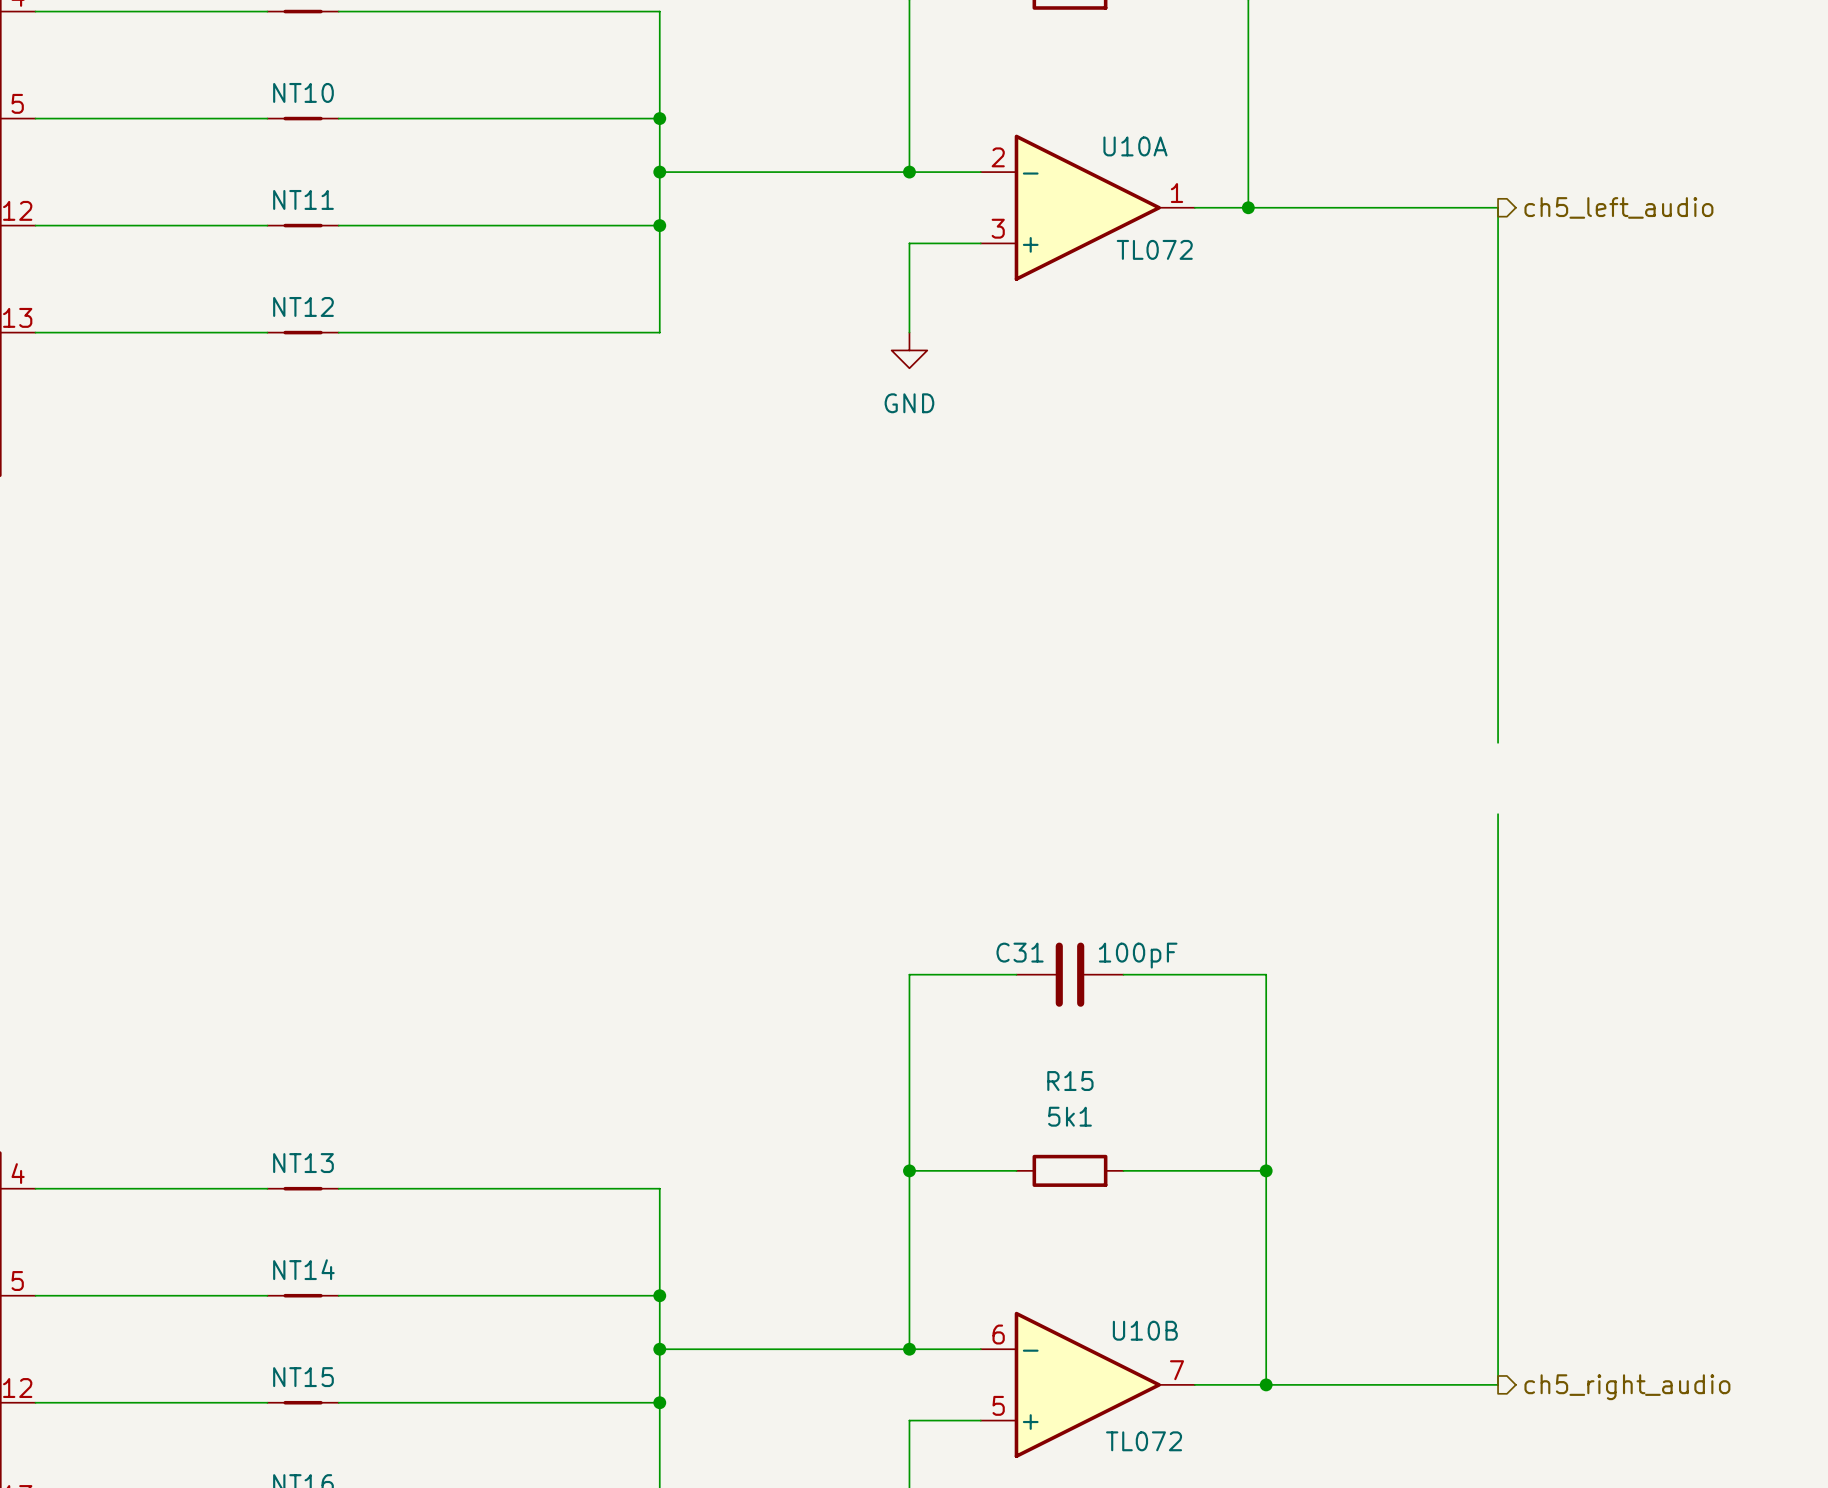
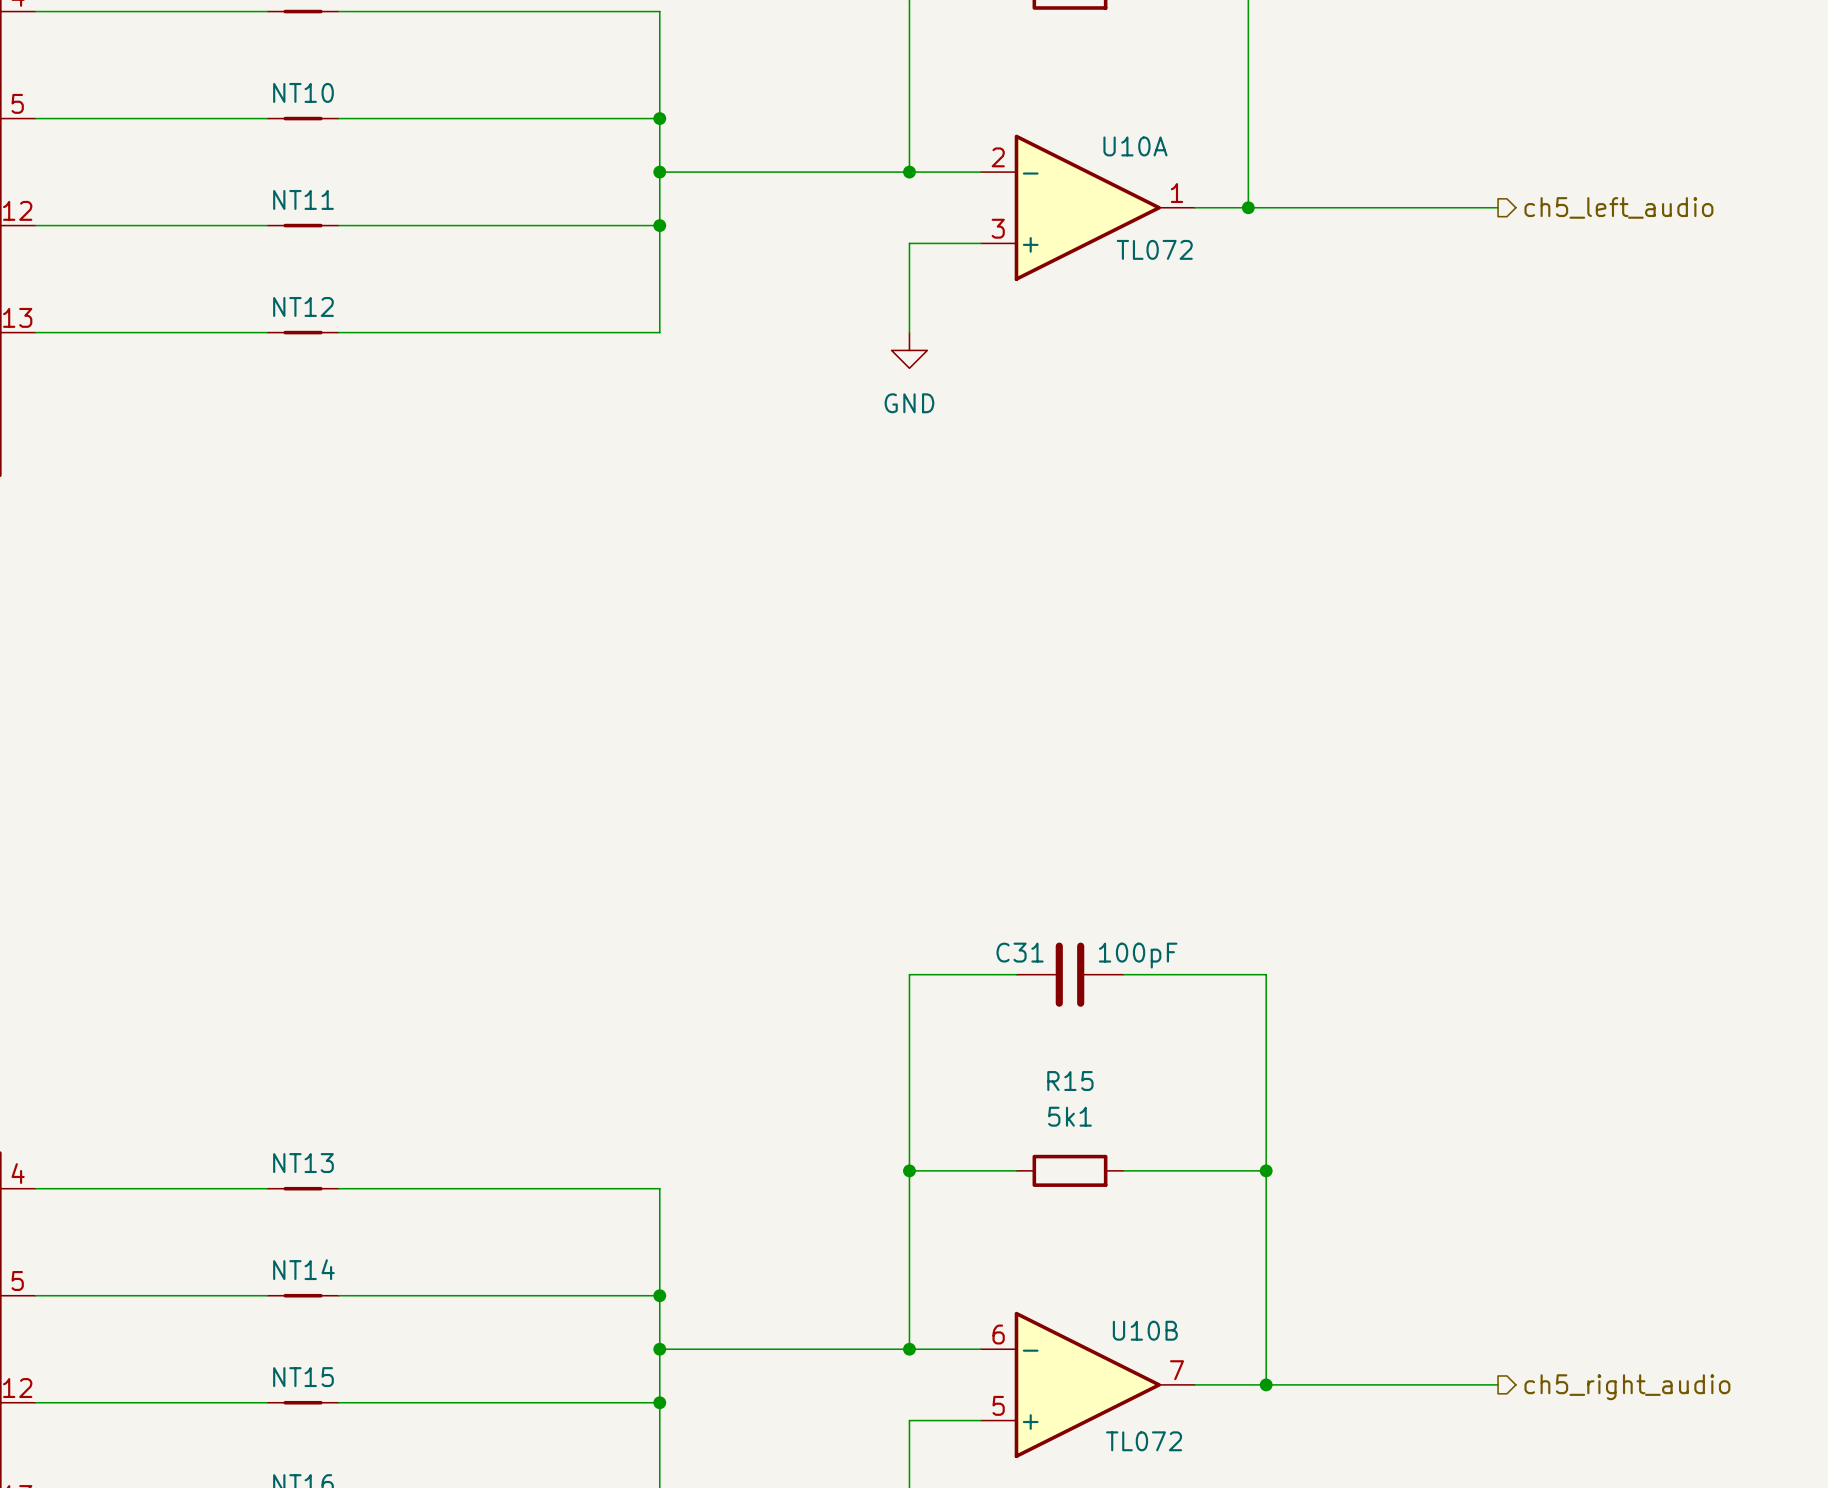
wire: (1498, 207) (1498, 742) -> none
wire: (1498, 814) (1498, 1384) -> none

